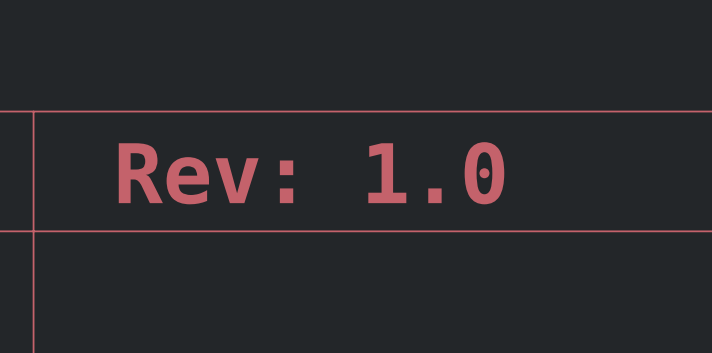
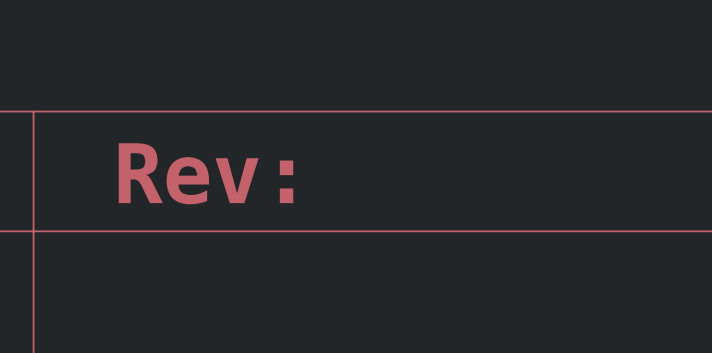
title block: Rev: 1.0 (311, 173) -> Rev: (205, 173)

